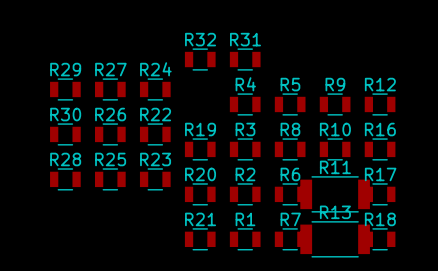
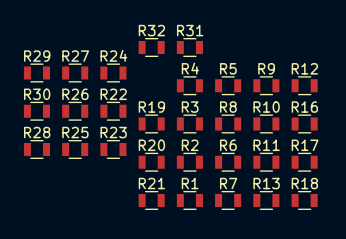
R11 footprint: [300, 176, 370, 213] -> [253, 152, 280, 172]
R13 footprint: [300, 221, 370, 258] -> [253, 191, 280, 210]

